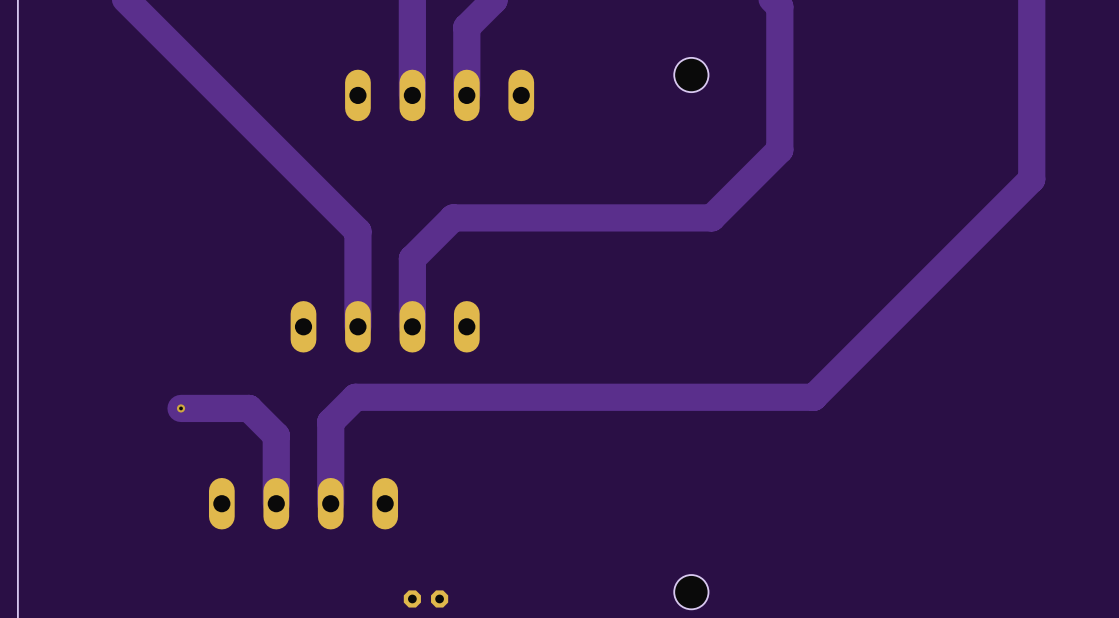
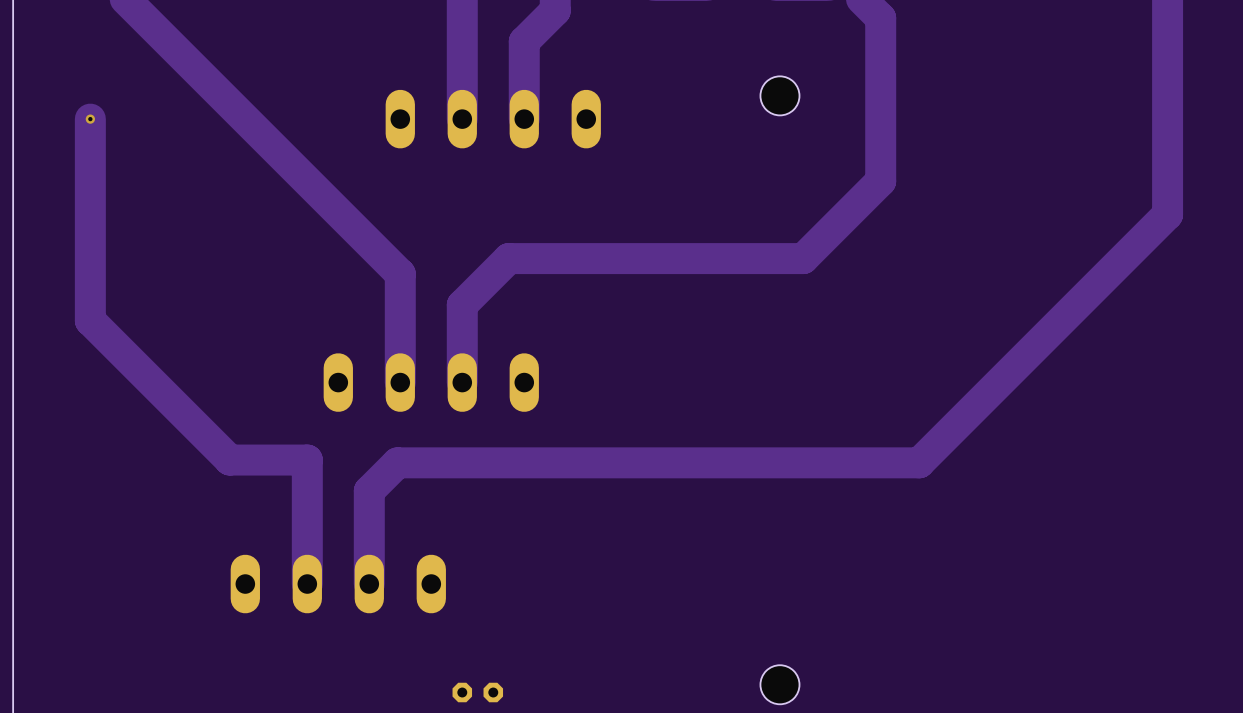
via: none -> (90, 119)
track: (181, 408) (249, 408) (276, 435) -> (90, 119) (90, 320) (229, 460) (307, 460) (307, 506)
via: (181, 408) -> none

